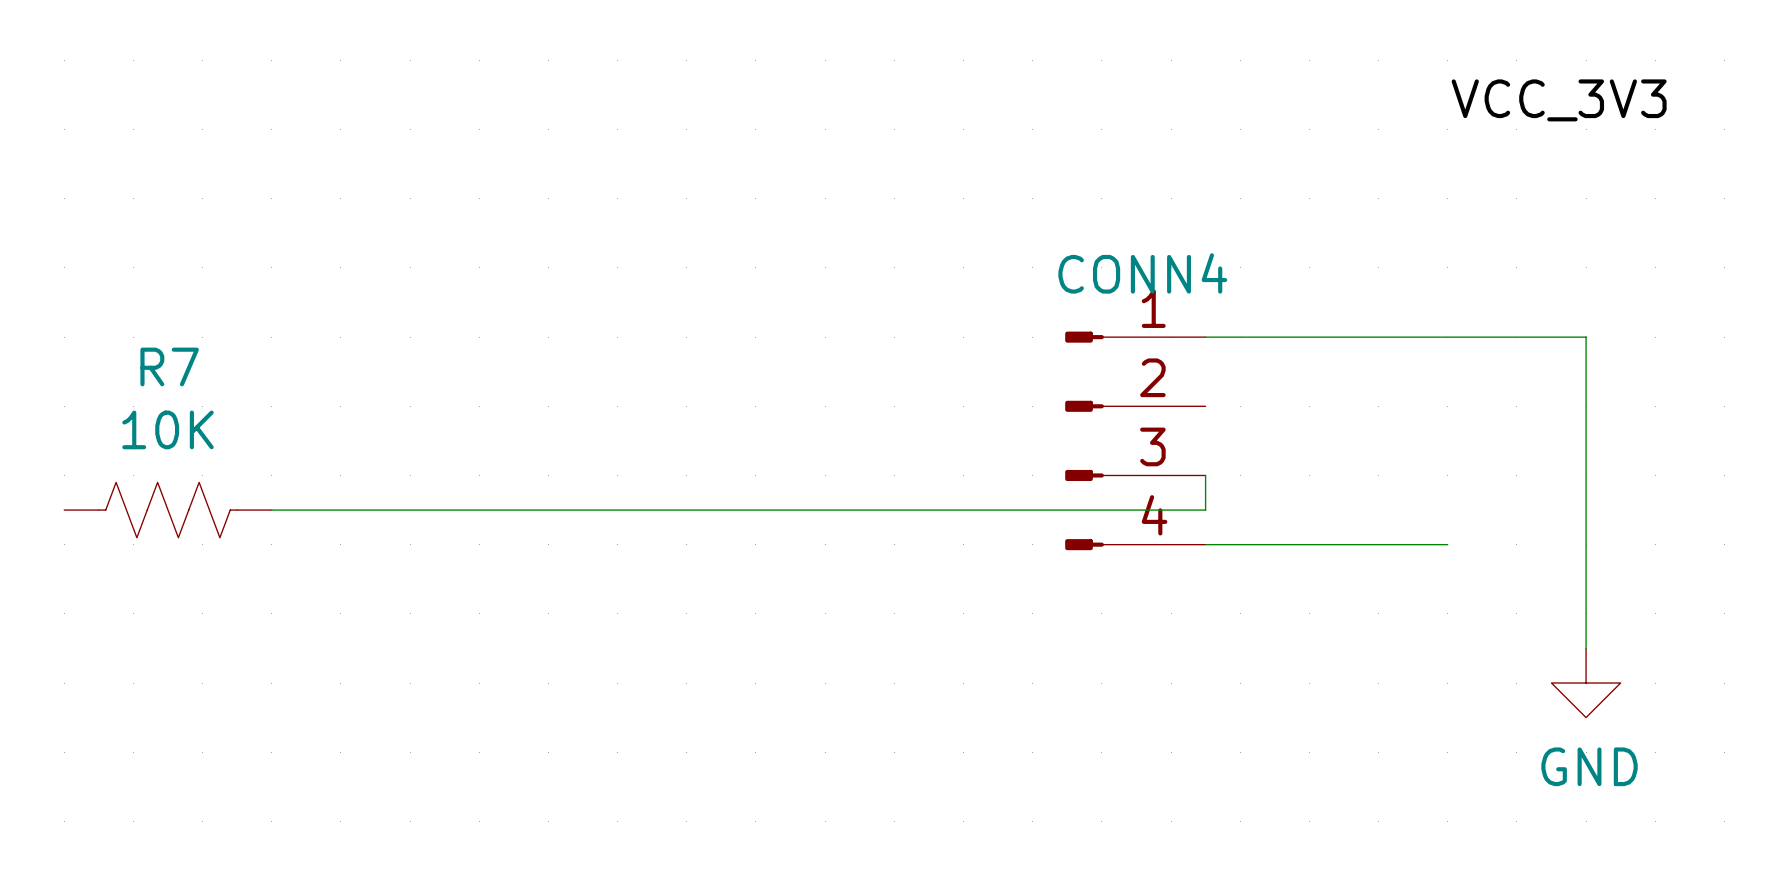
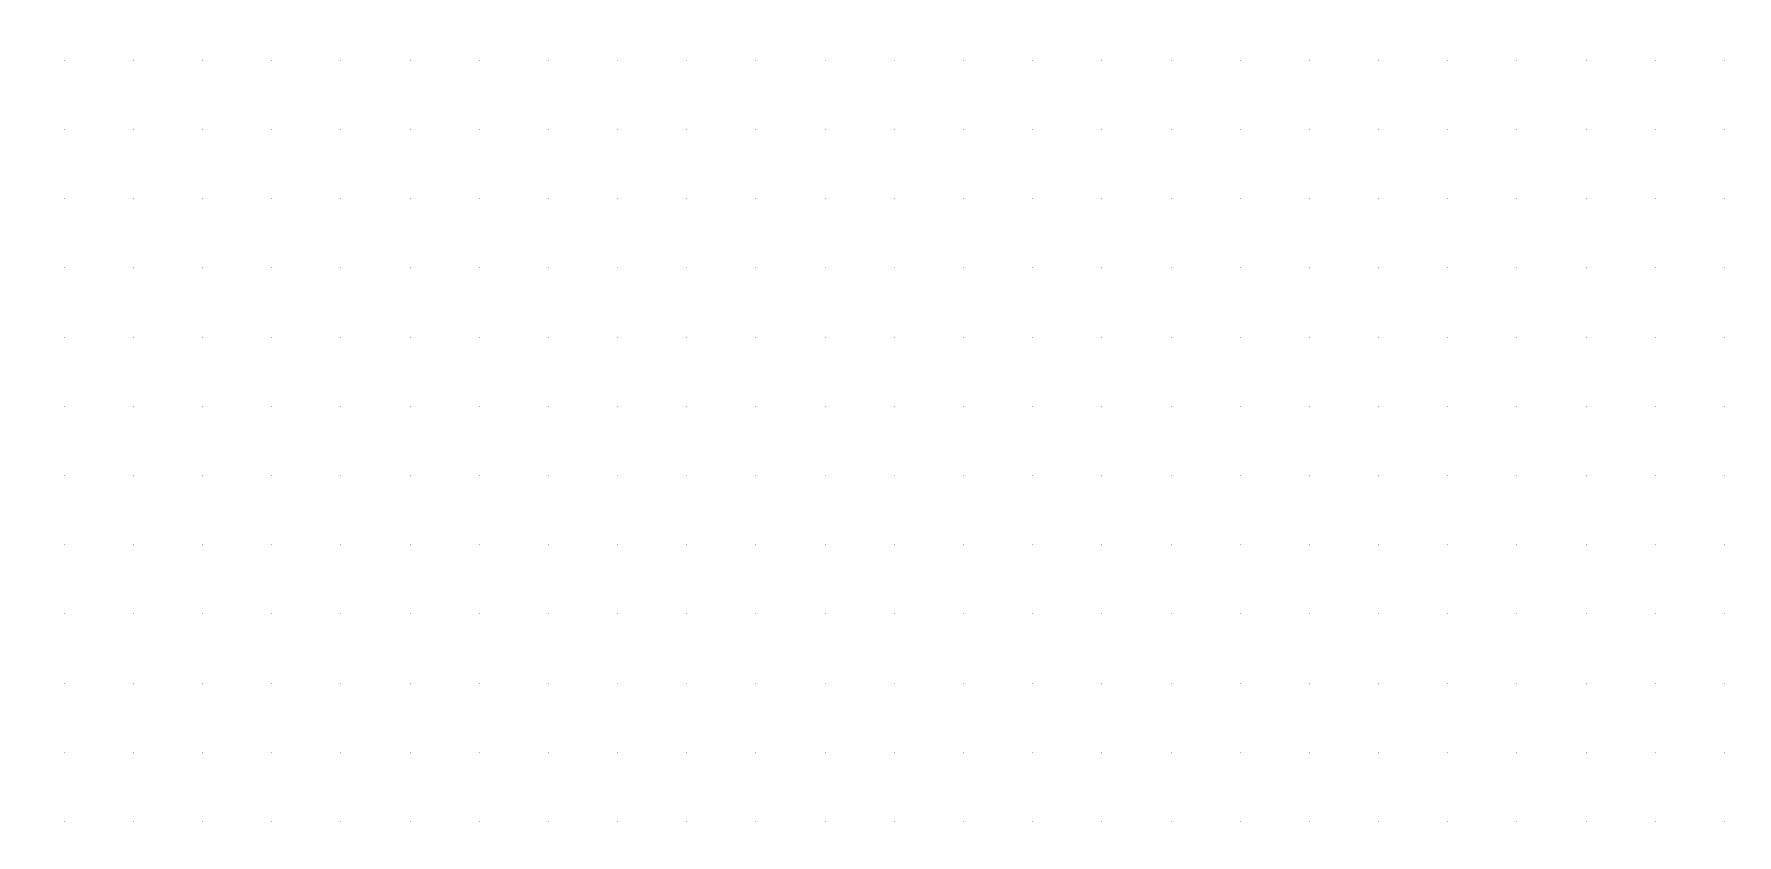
label: VCC_3V3 (1559, 100) -> none
wire: (1205, 337) (1586, 337) (1586, 648) -> none
CONN4: (1135, 440) -> none
wire: (1205, 475) (1205, 510) (271, 510) -> none
R7: 10K (168, 510) -> none
wire: (1205, 544) (1447, 544) -> none
power symbol: GND (1586, 683) -> none

